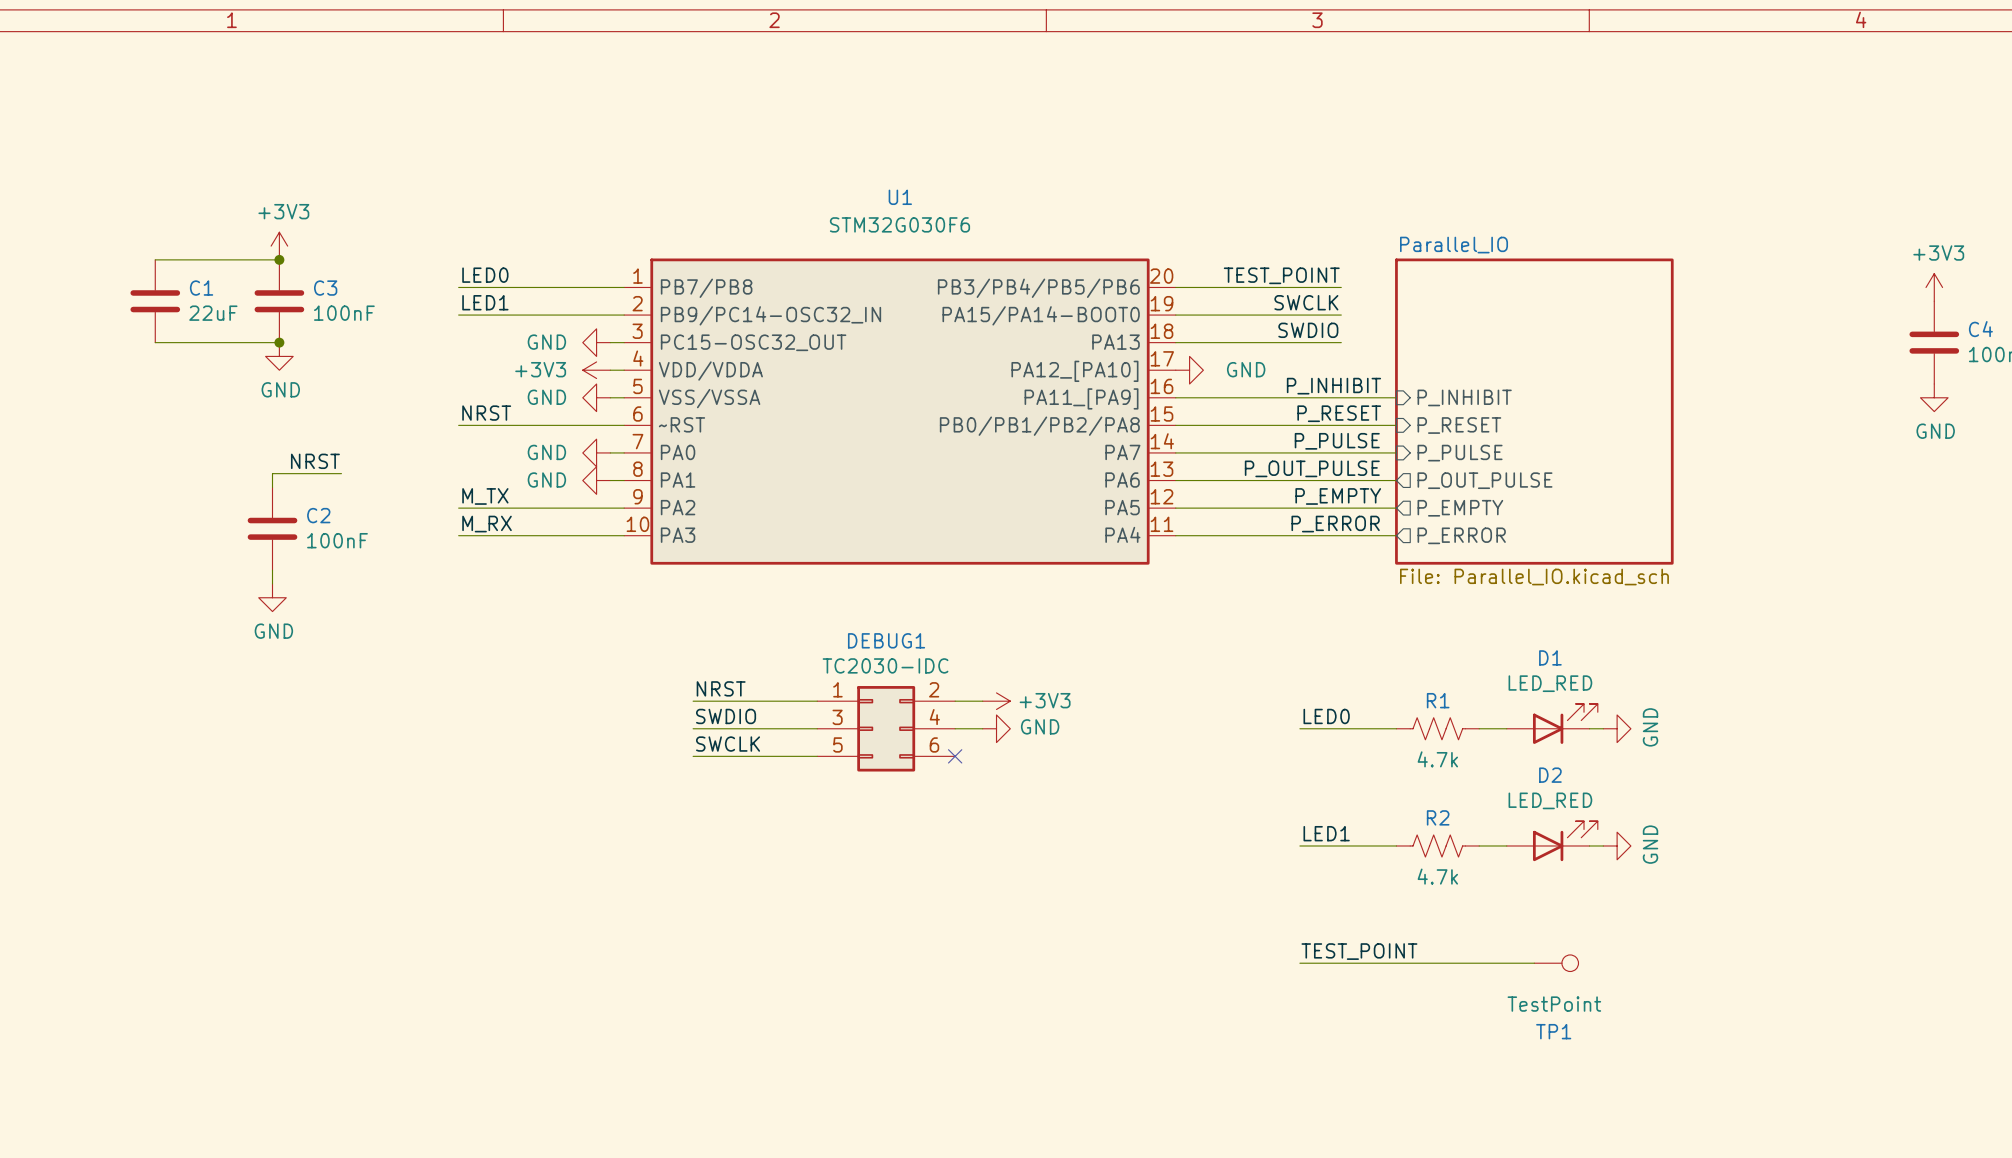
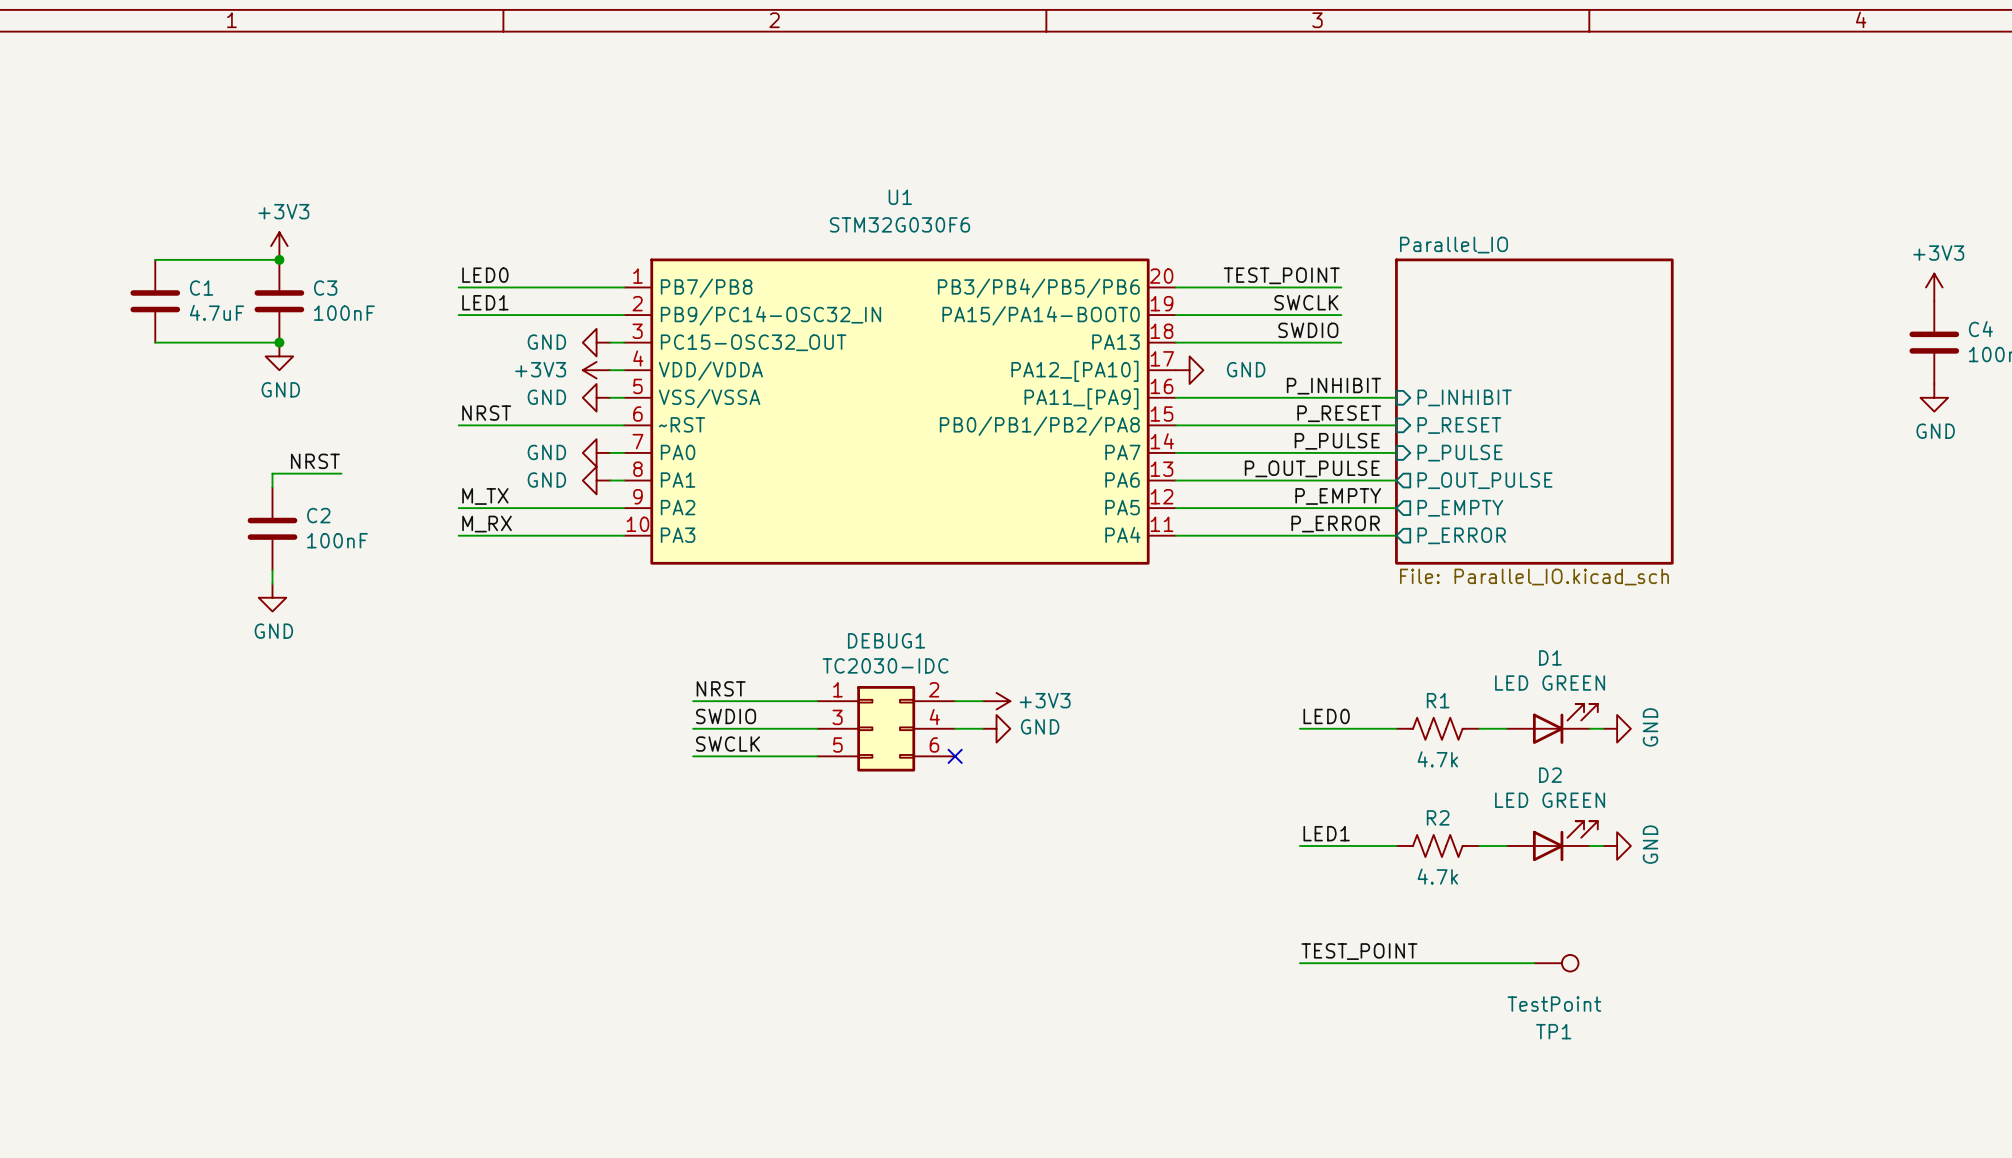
C1 value: 22uF (213, 313) -> 4.7uF (216, 312)
D1 value: LED_RED (1550, 683) -> LED GREEN (1550, 683)
D2 value: LED_RED (1550, 800) -> LED GREEN (1550, 800)

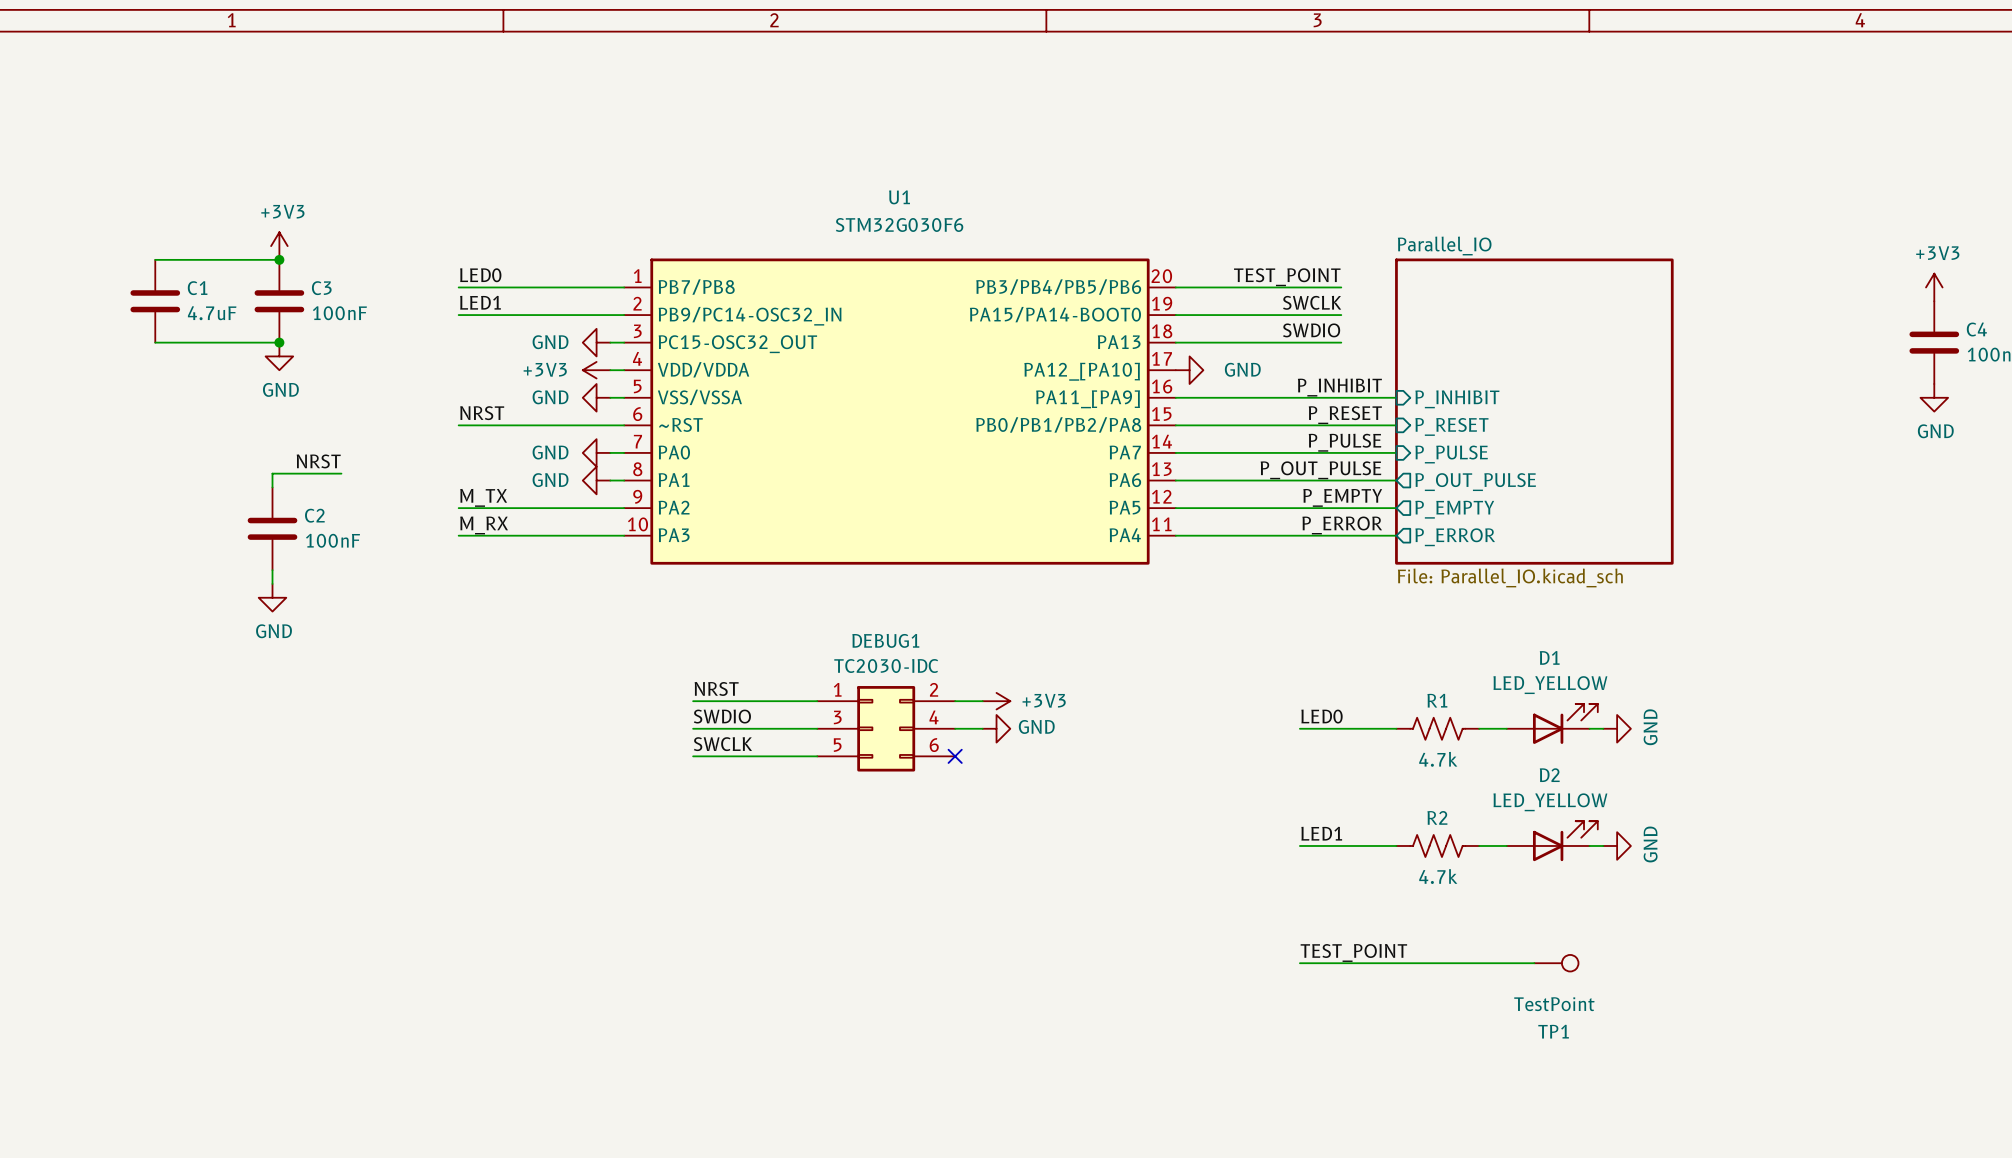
D1 value: LED GREEN (1550, 683) -> LED_YELLOW (1550, 685)
D2 value: LED GREEN (1550, 800) -> LED_YELLOW (1550, 802)

